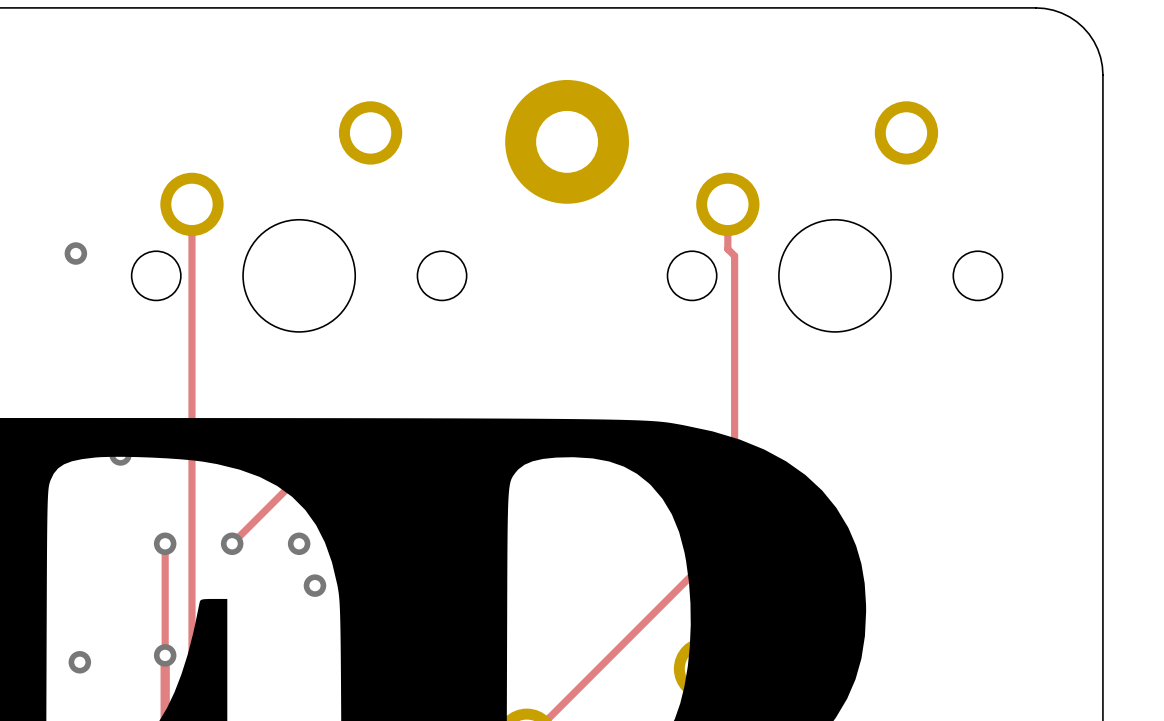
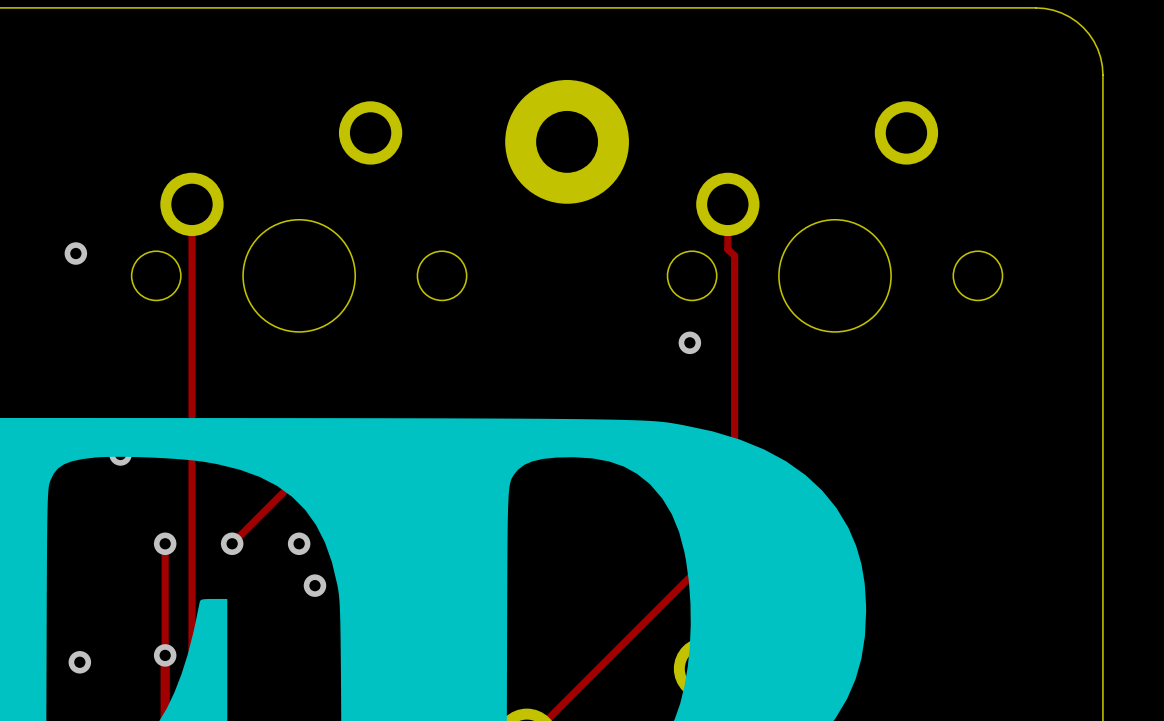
via: none -> (689, 342)

